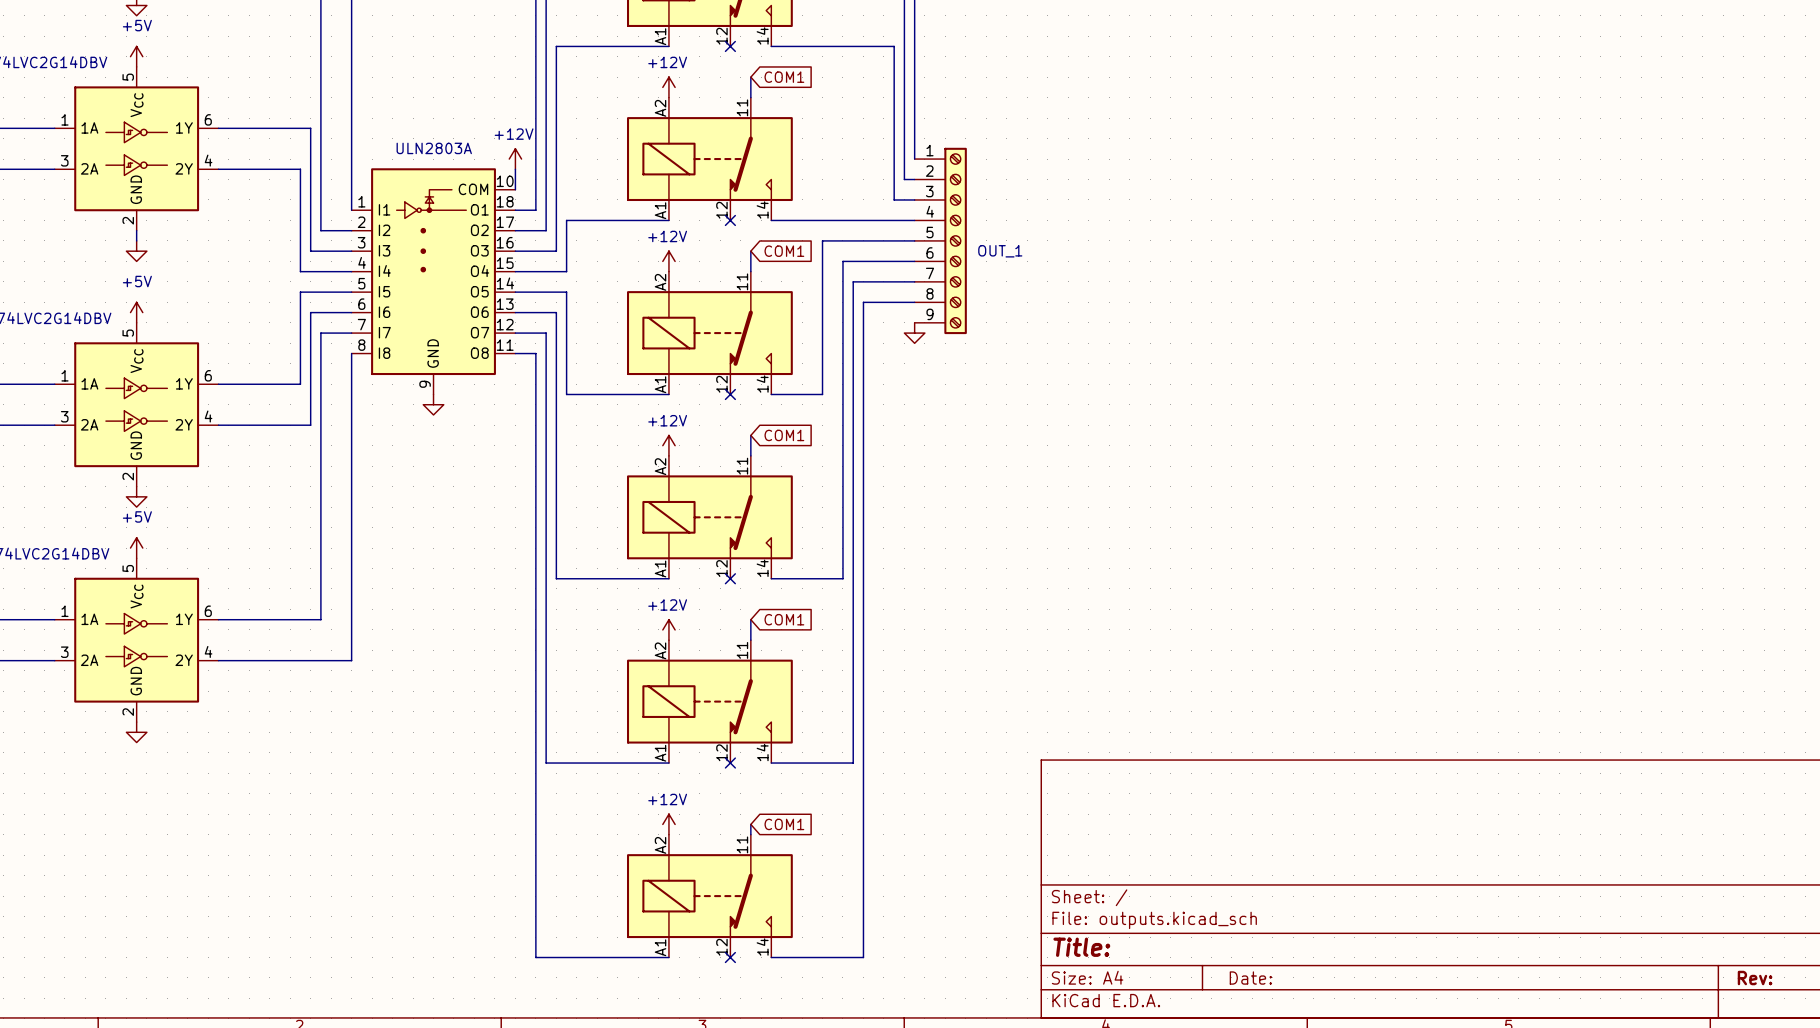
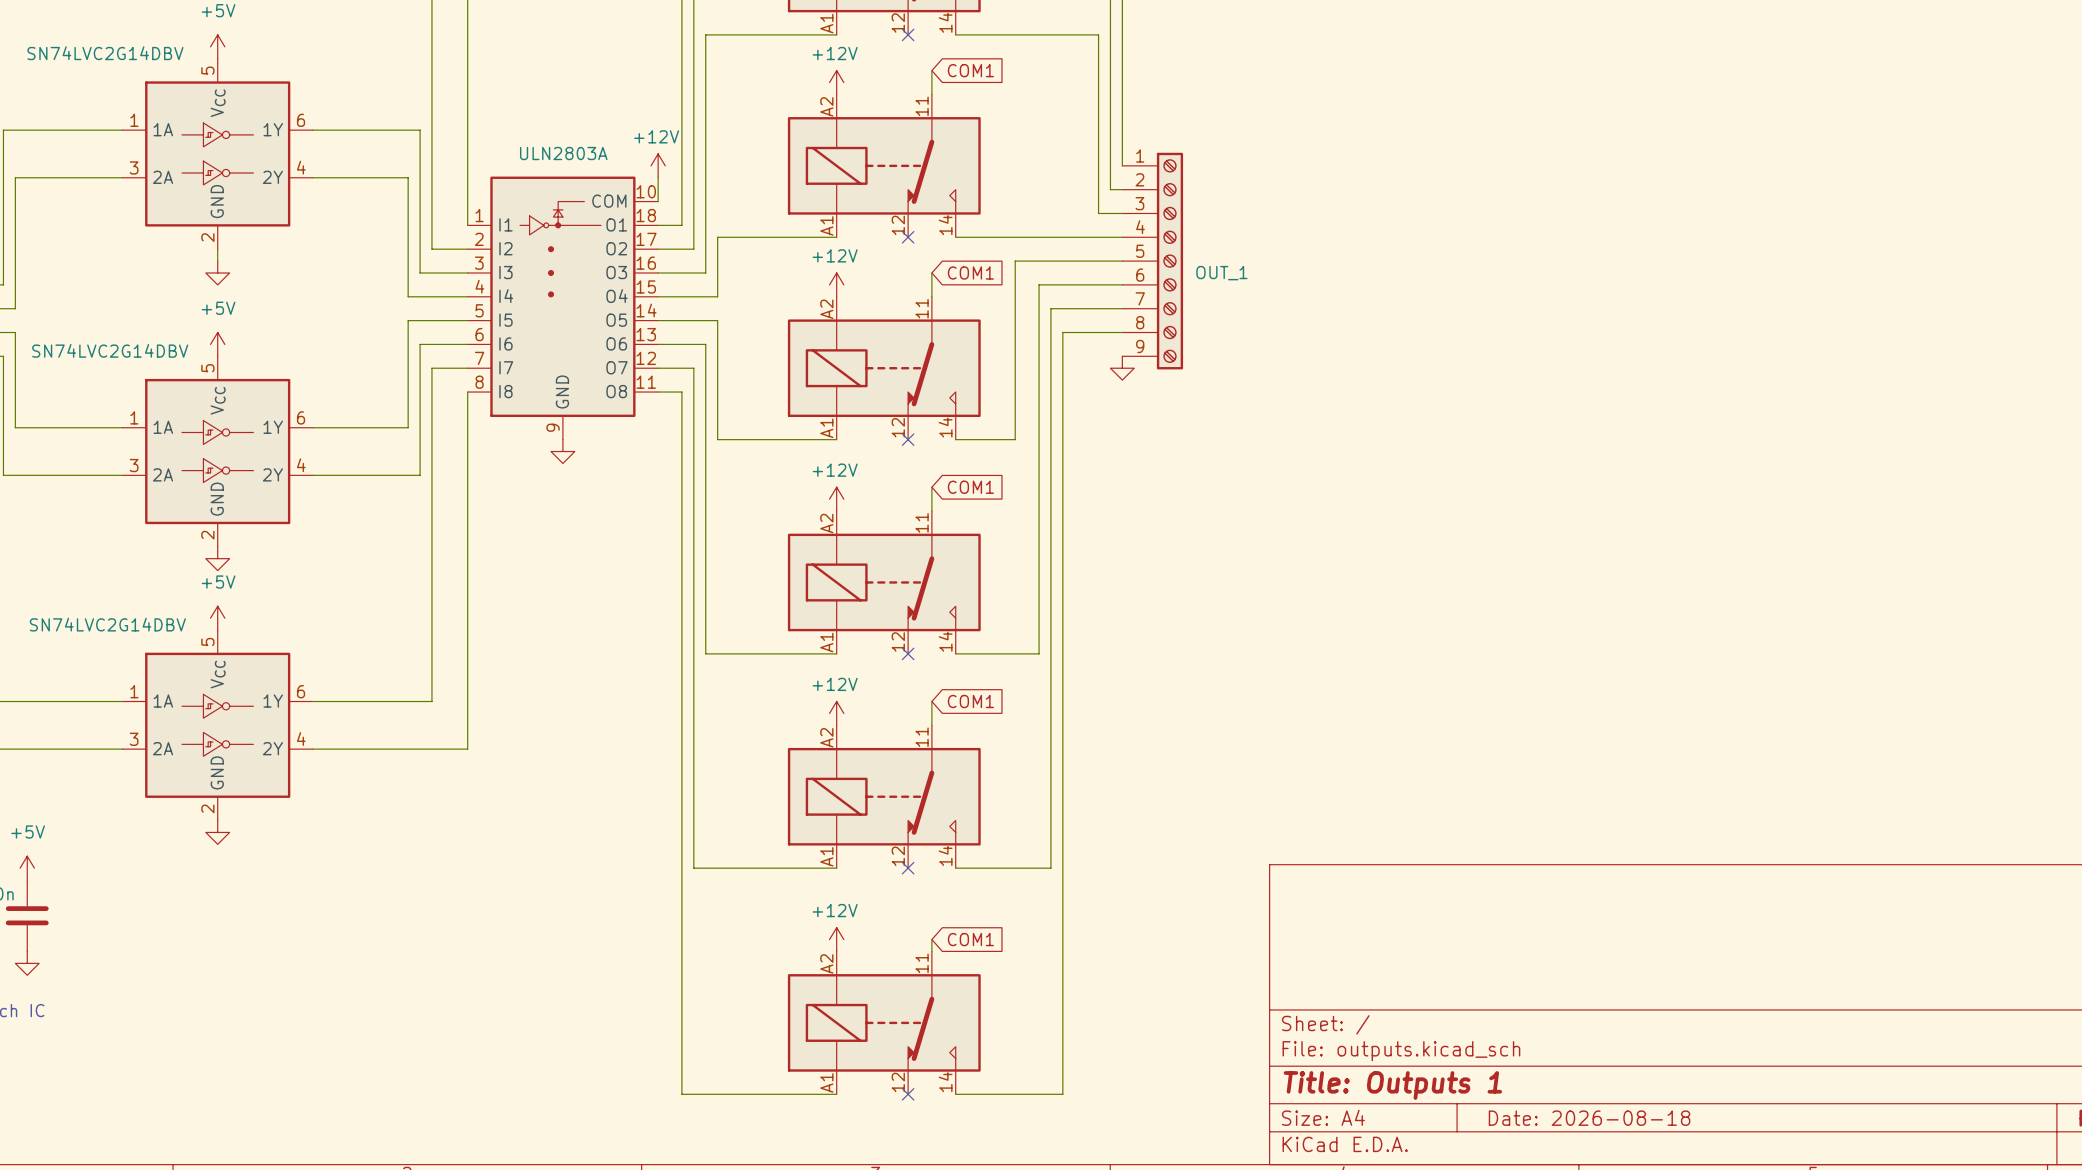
title block: Title: (1081, 947) -> Title: Outputs 1 (1392, 1085)
title block: Date: (1250, 978) -> Date: 2026-08-18 (1589, 1118)

